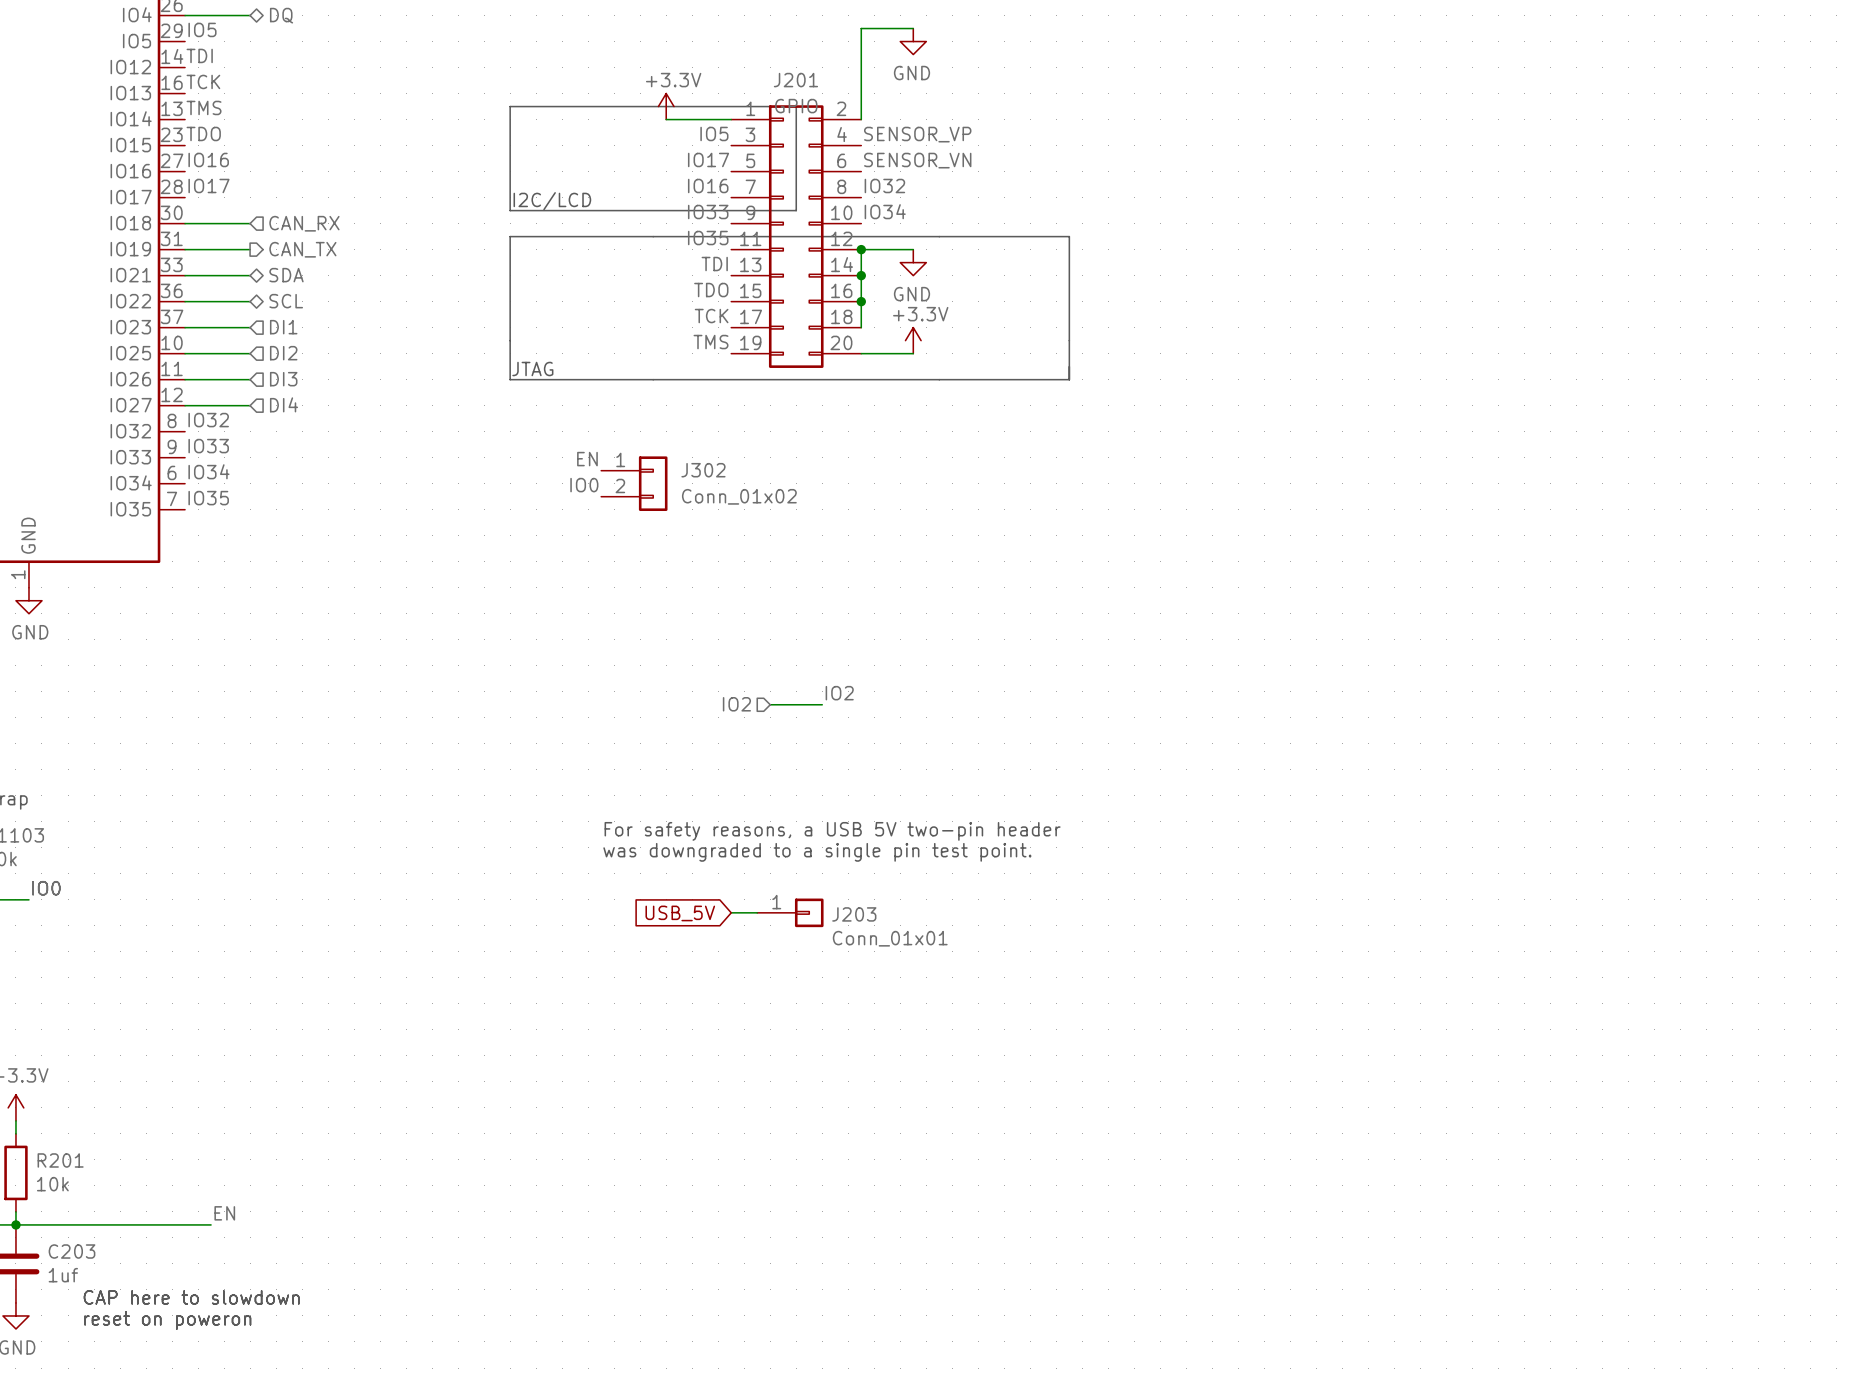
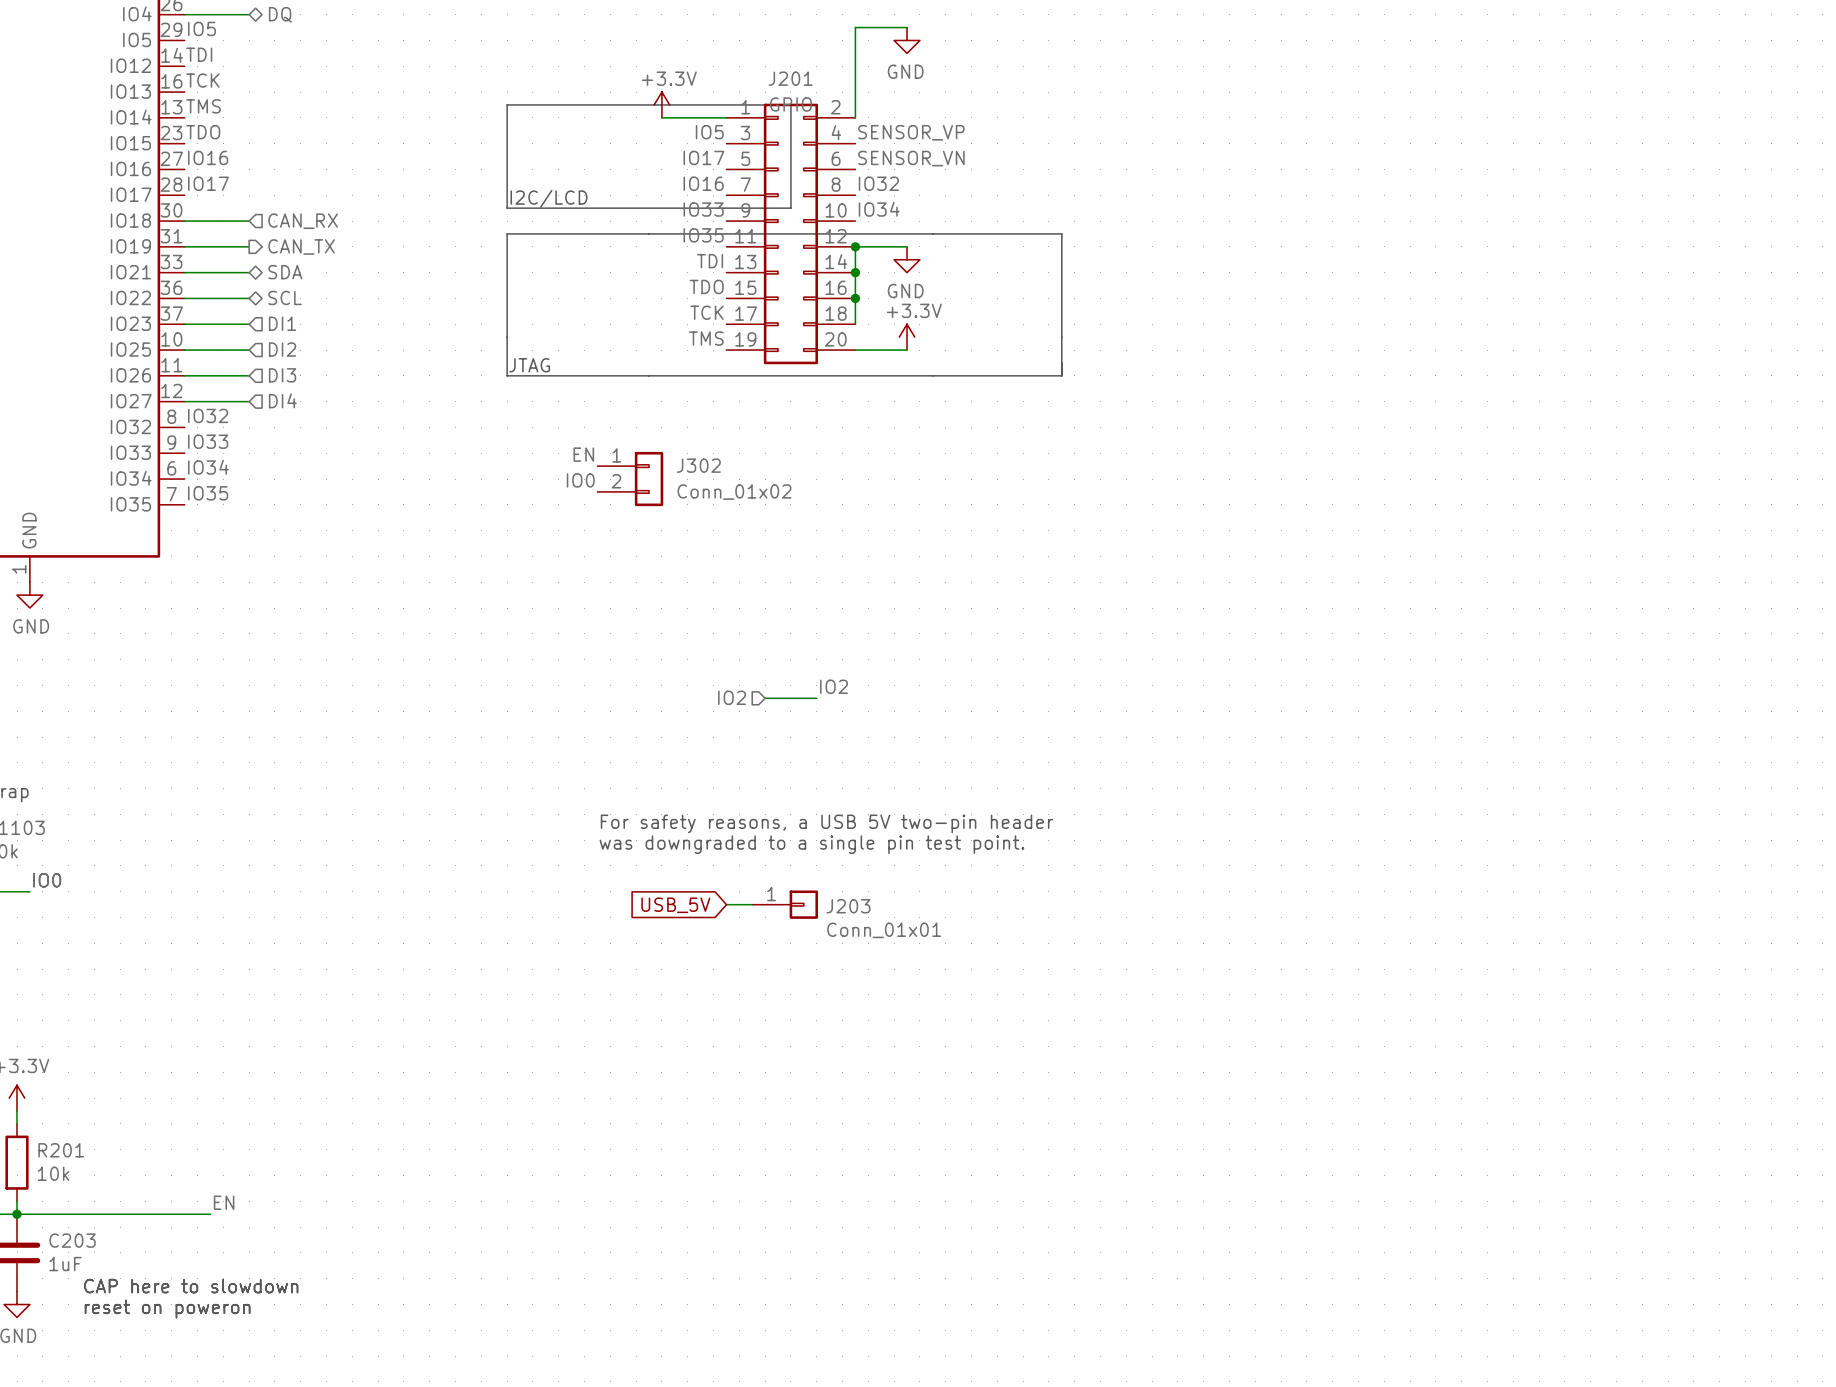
C203 value: 1uf (63, 1275) -> 1uF (65, 1264)

